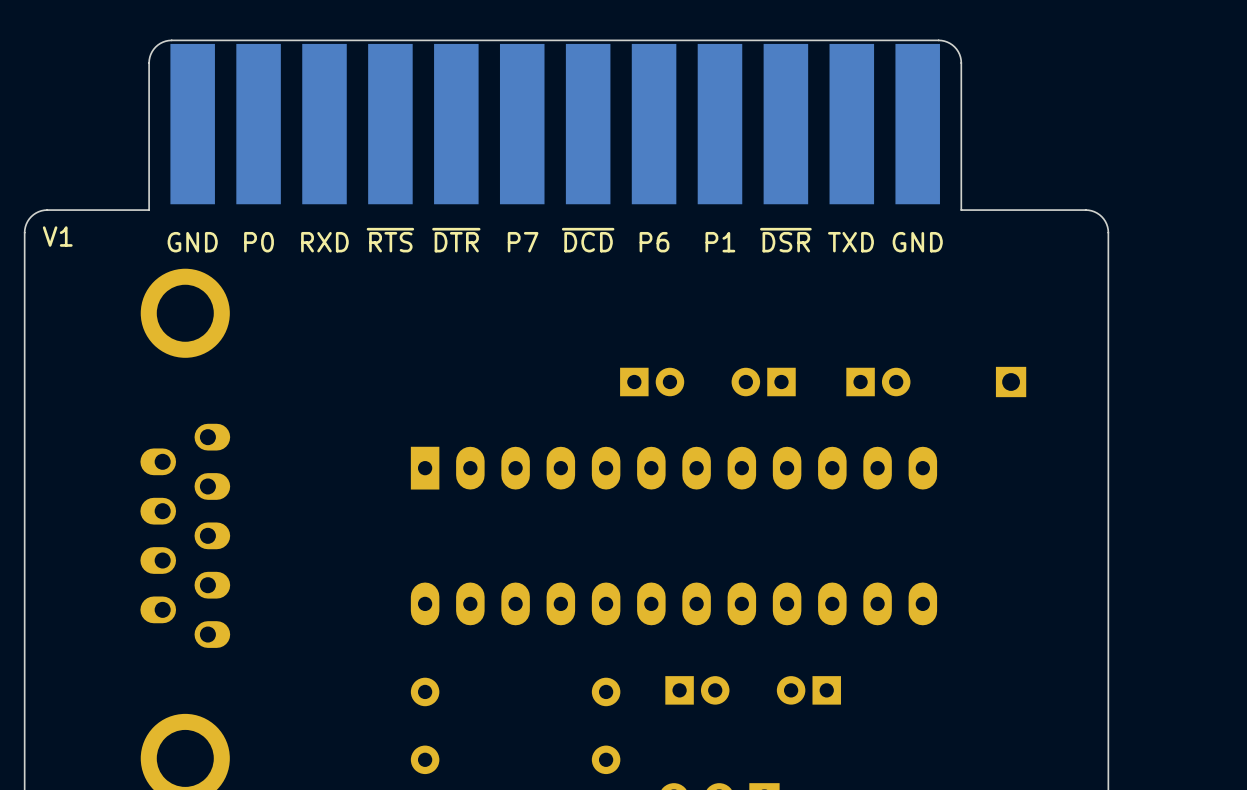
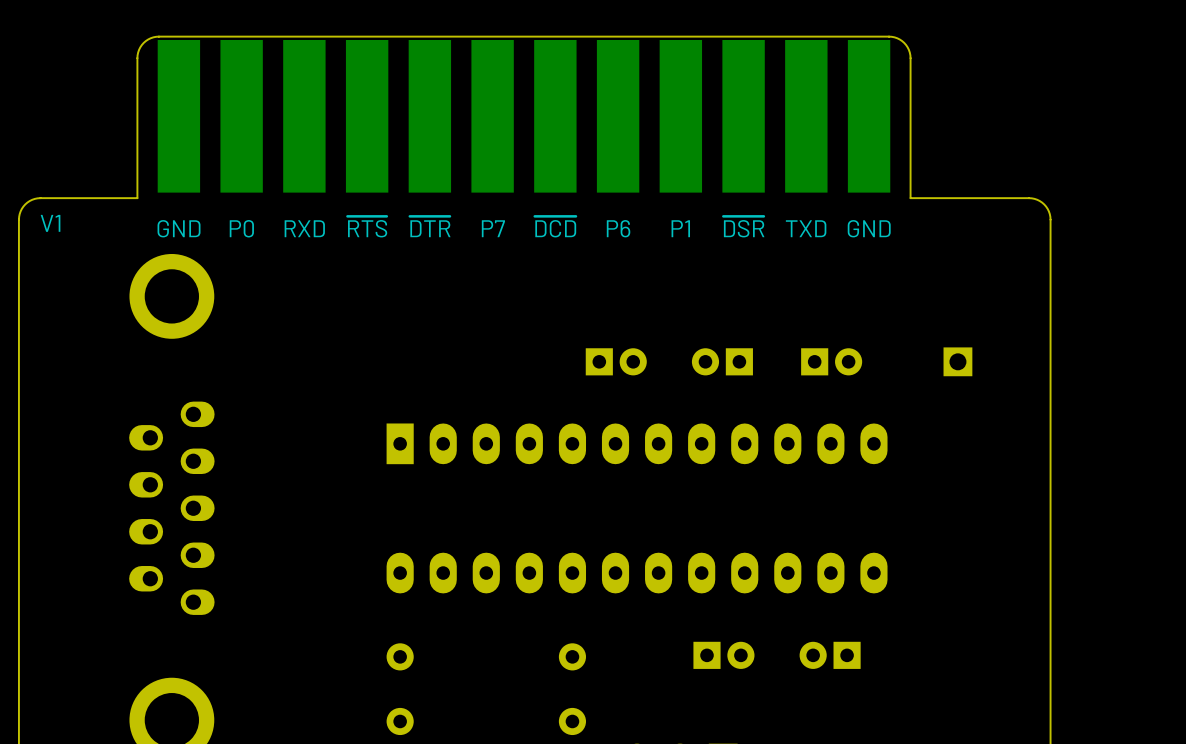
part: (697, 690) -> none
part: none -> (723, 655)
part: (808, 690) -> none
part: none -> (830, 655)

